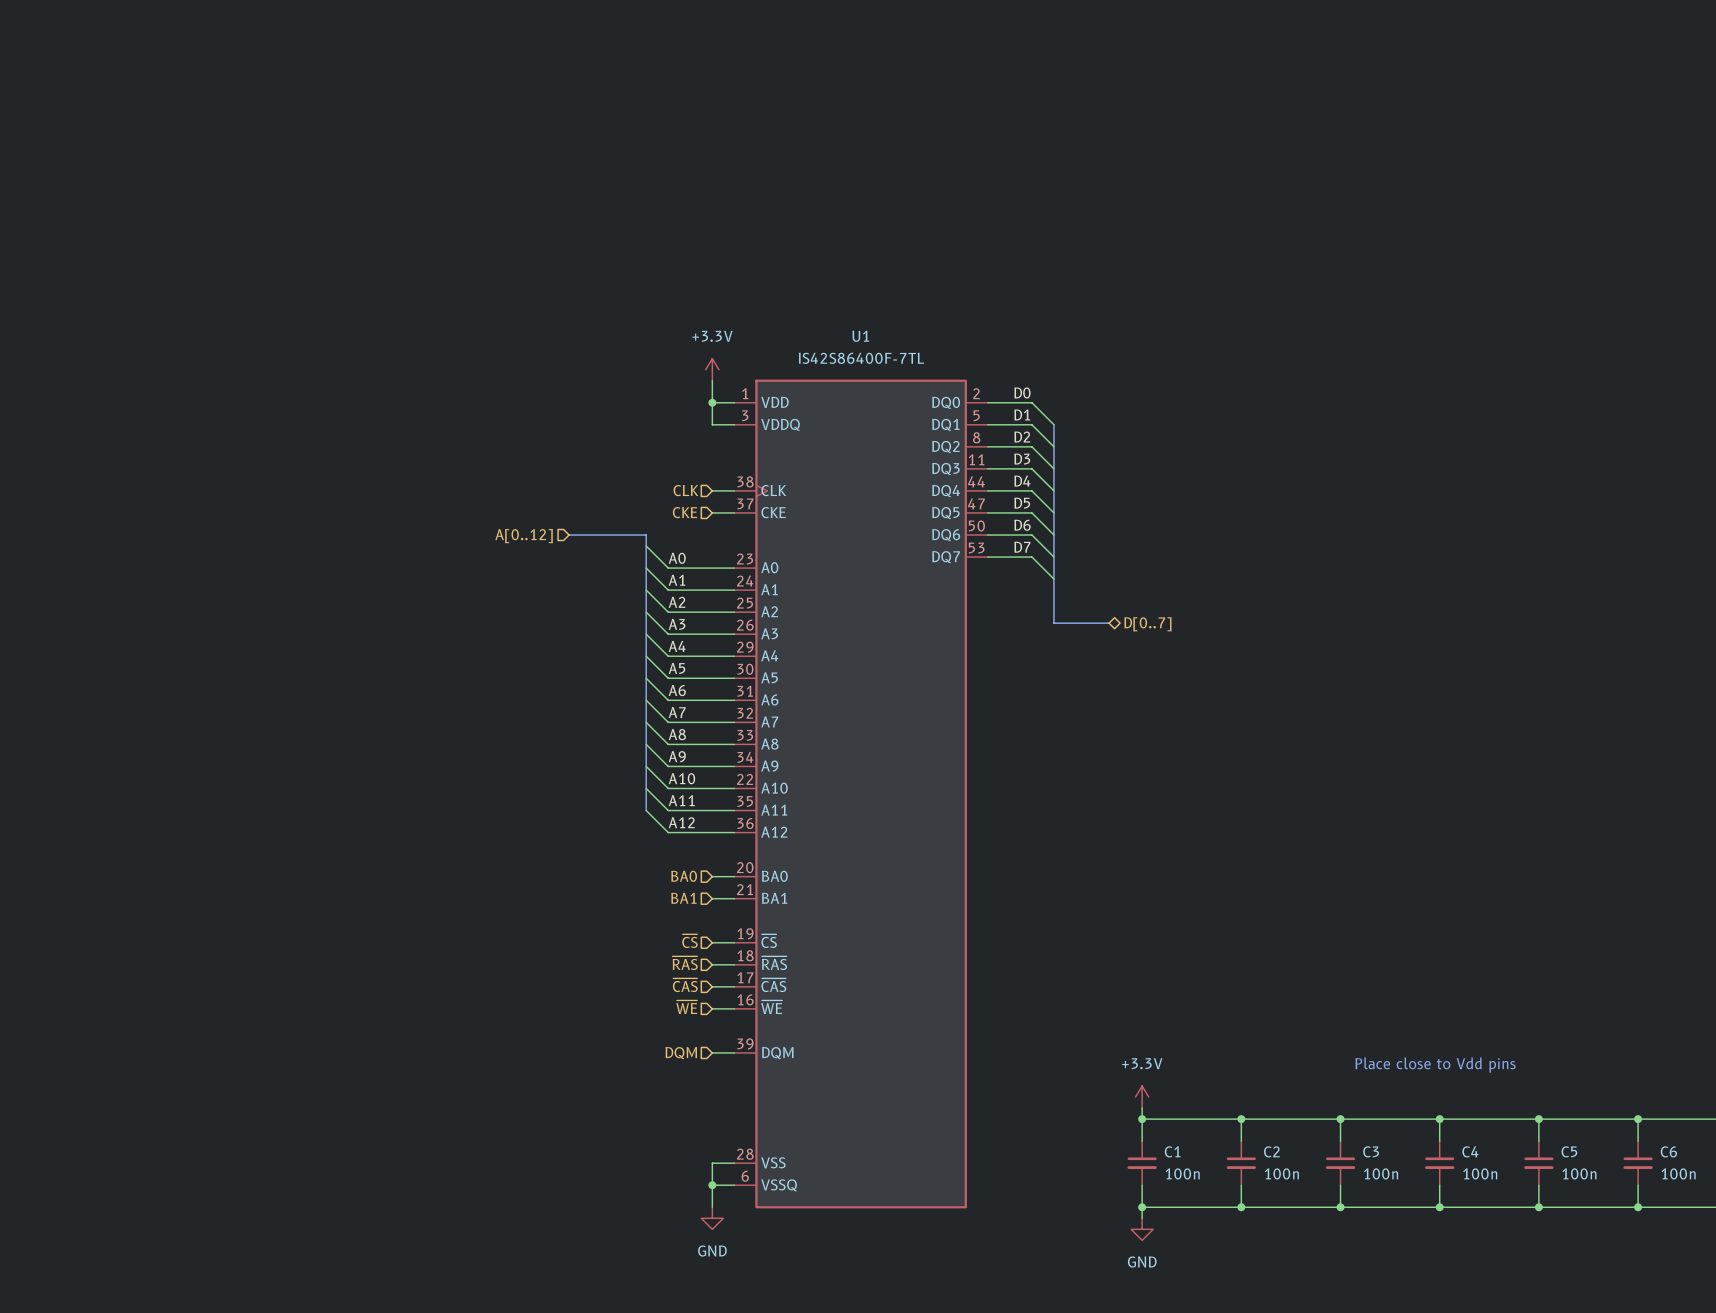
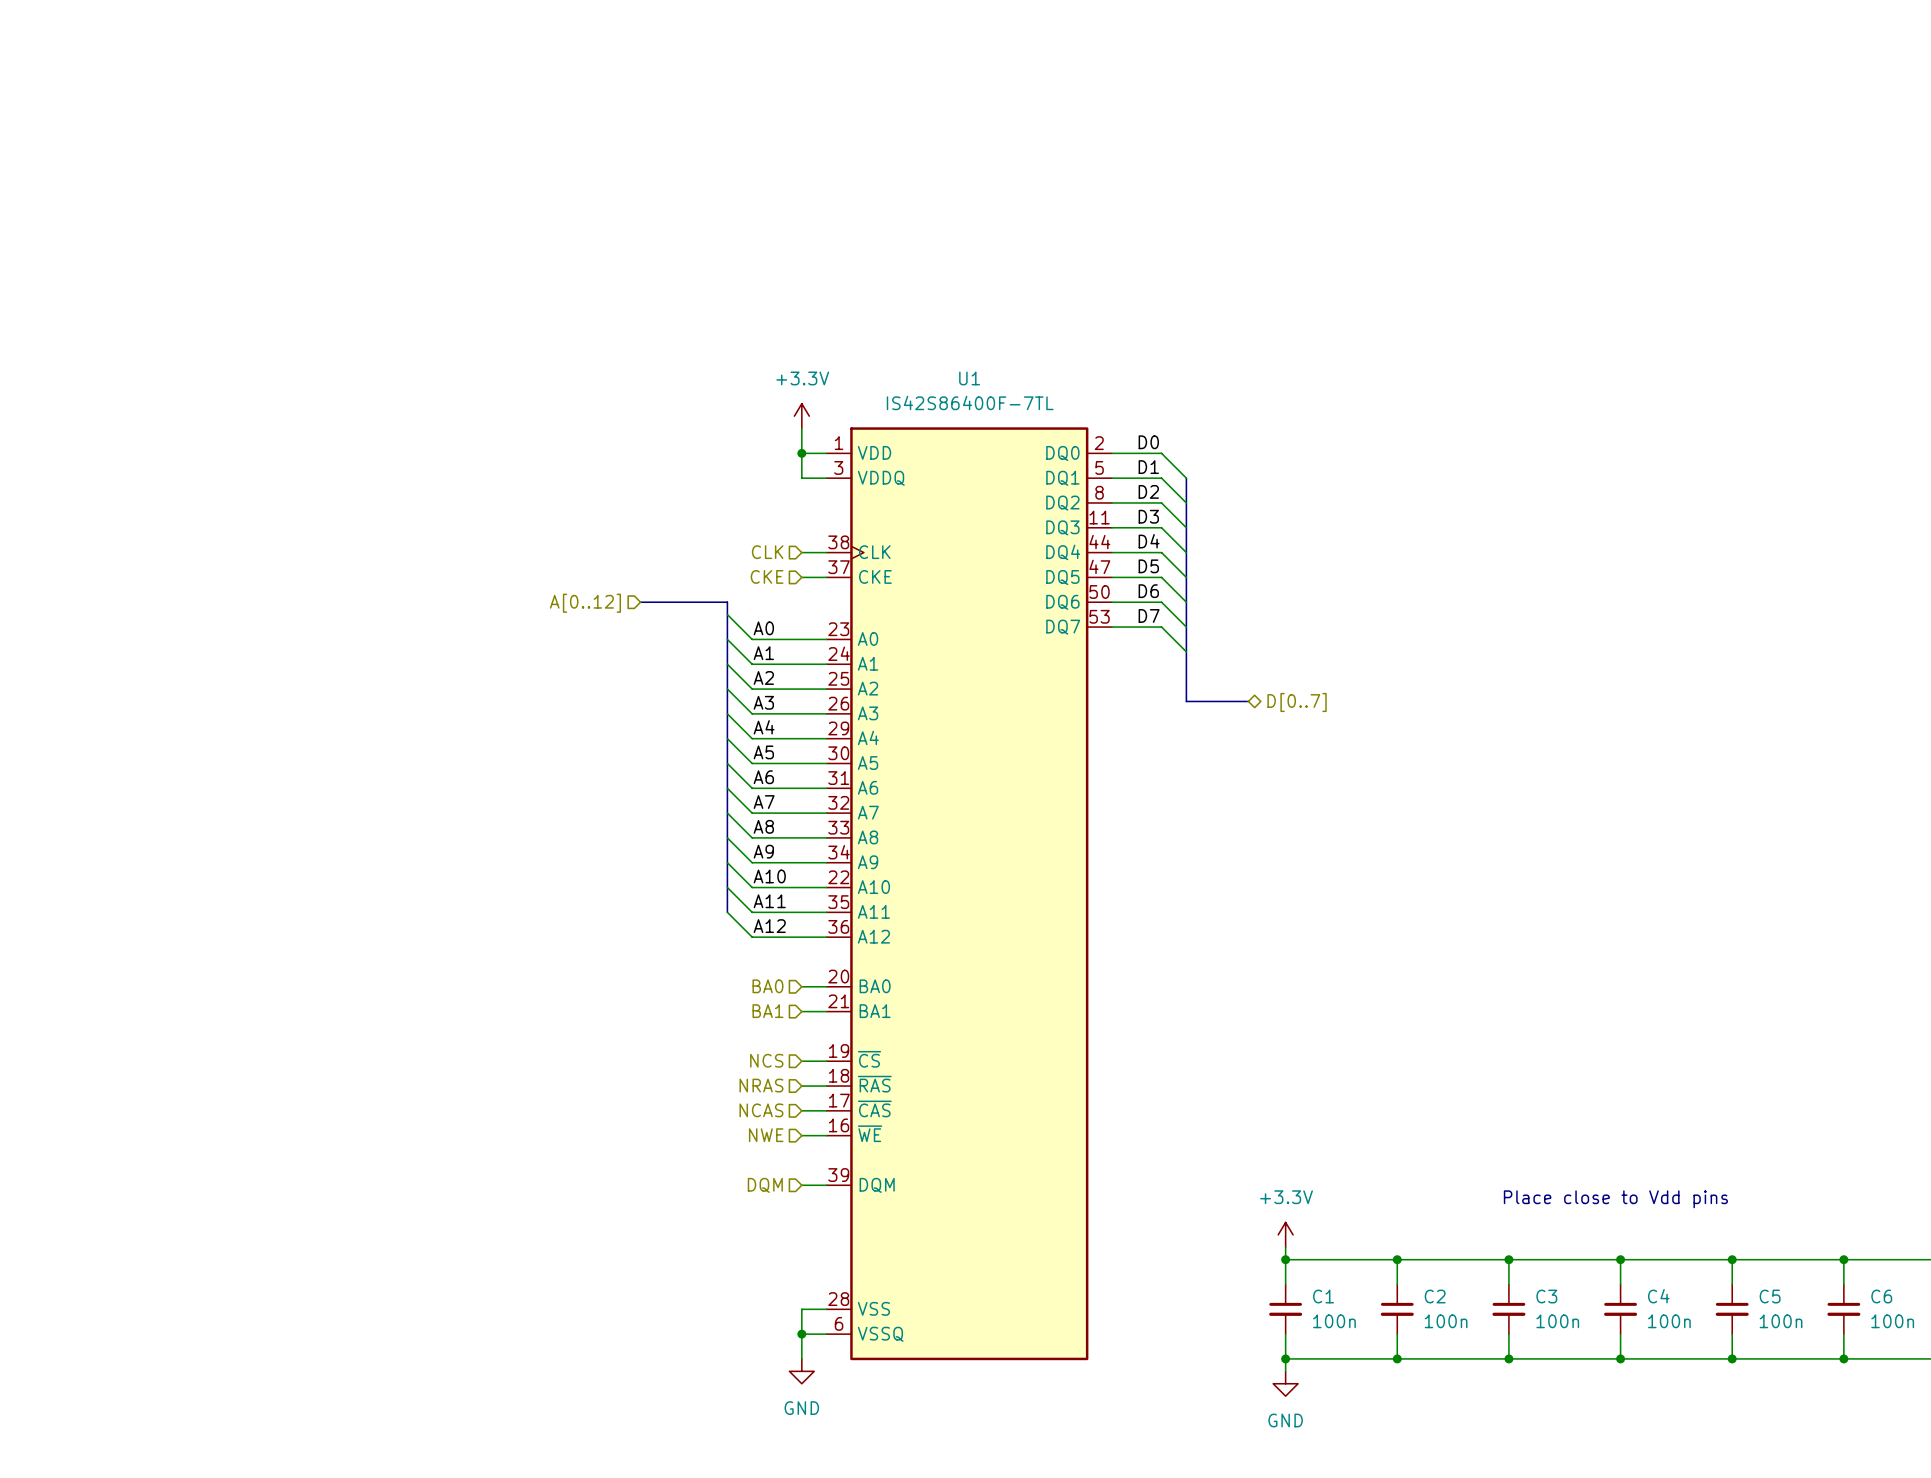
hierarchical label: ~{CS} (690, 941) -> NCS (766, 1060)
hierarchical label: ~{RAS} (685, 963) -> NRAS (761, 1085)
hierarchical label: ~{CAS} (685, 985) -> NCAS (761, 1110)
hierarchical label: ~{WE} (686, 1007) -> NWE (766, 1135)

